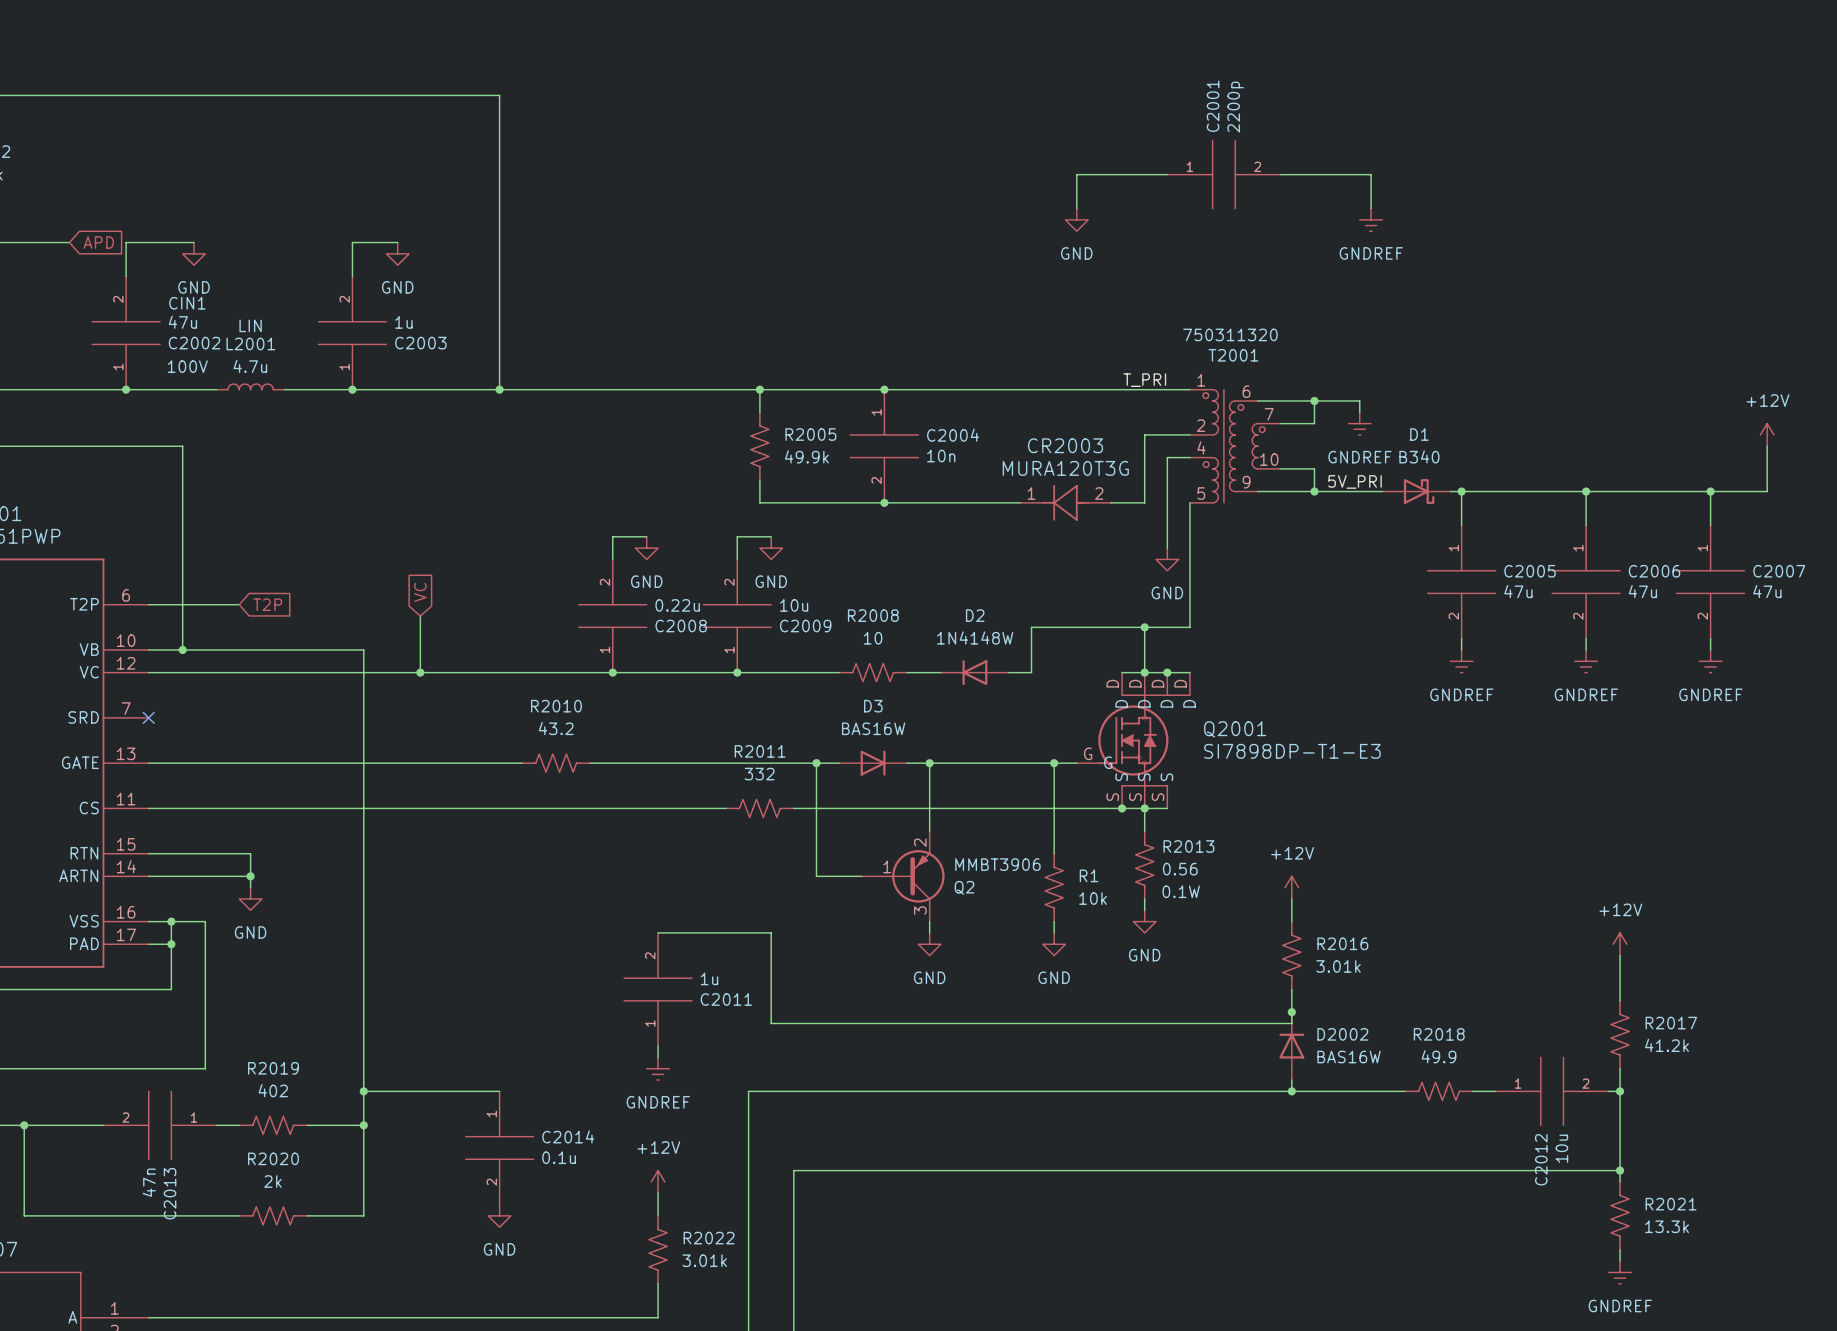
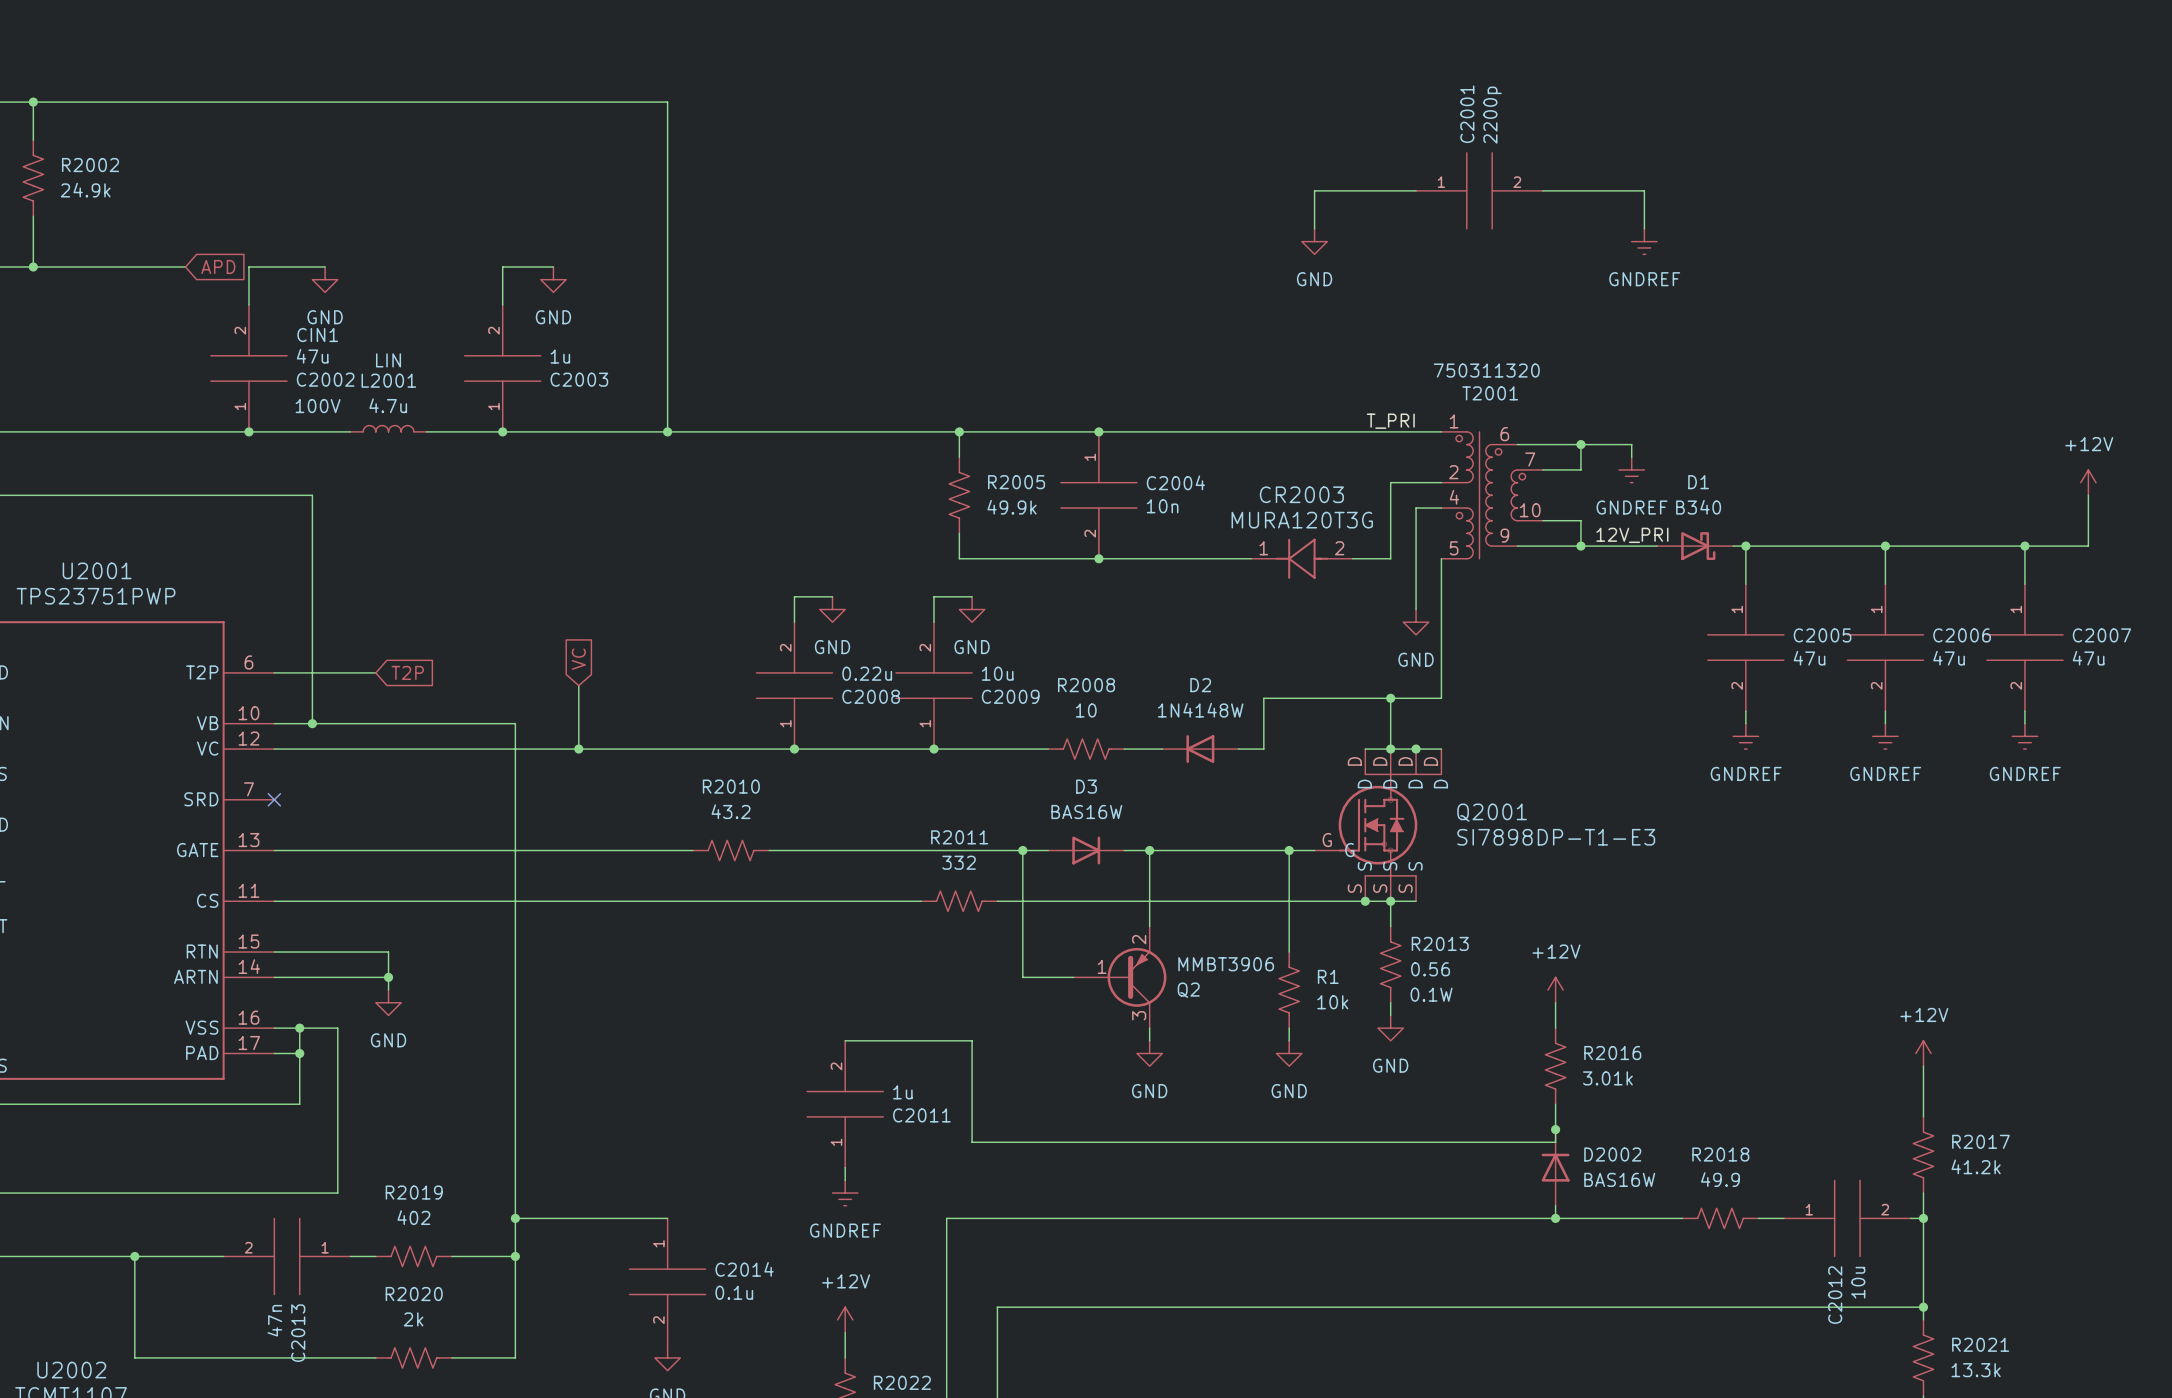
label: 5V_PRI (1354, 481) -> 12V_PRI (1632, 535)

